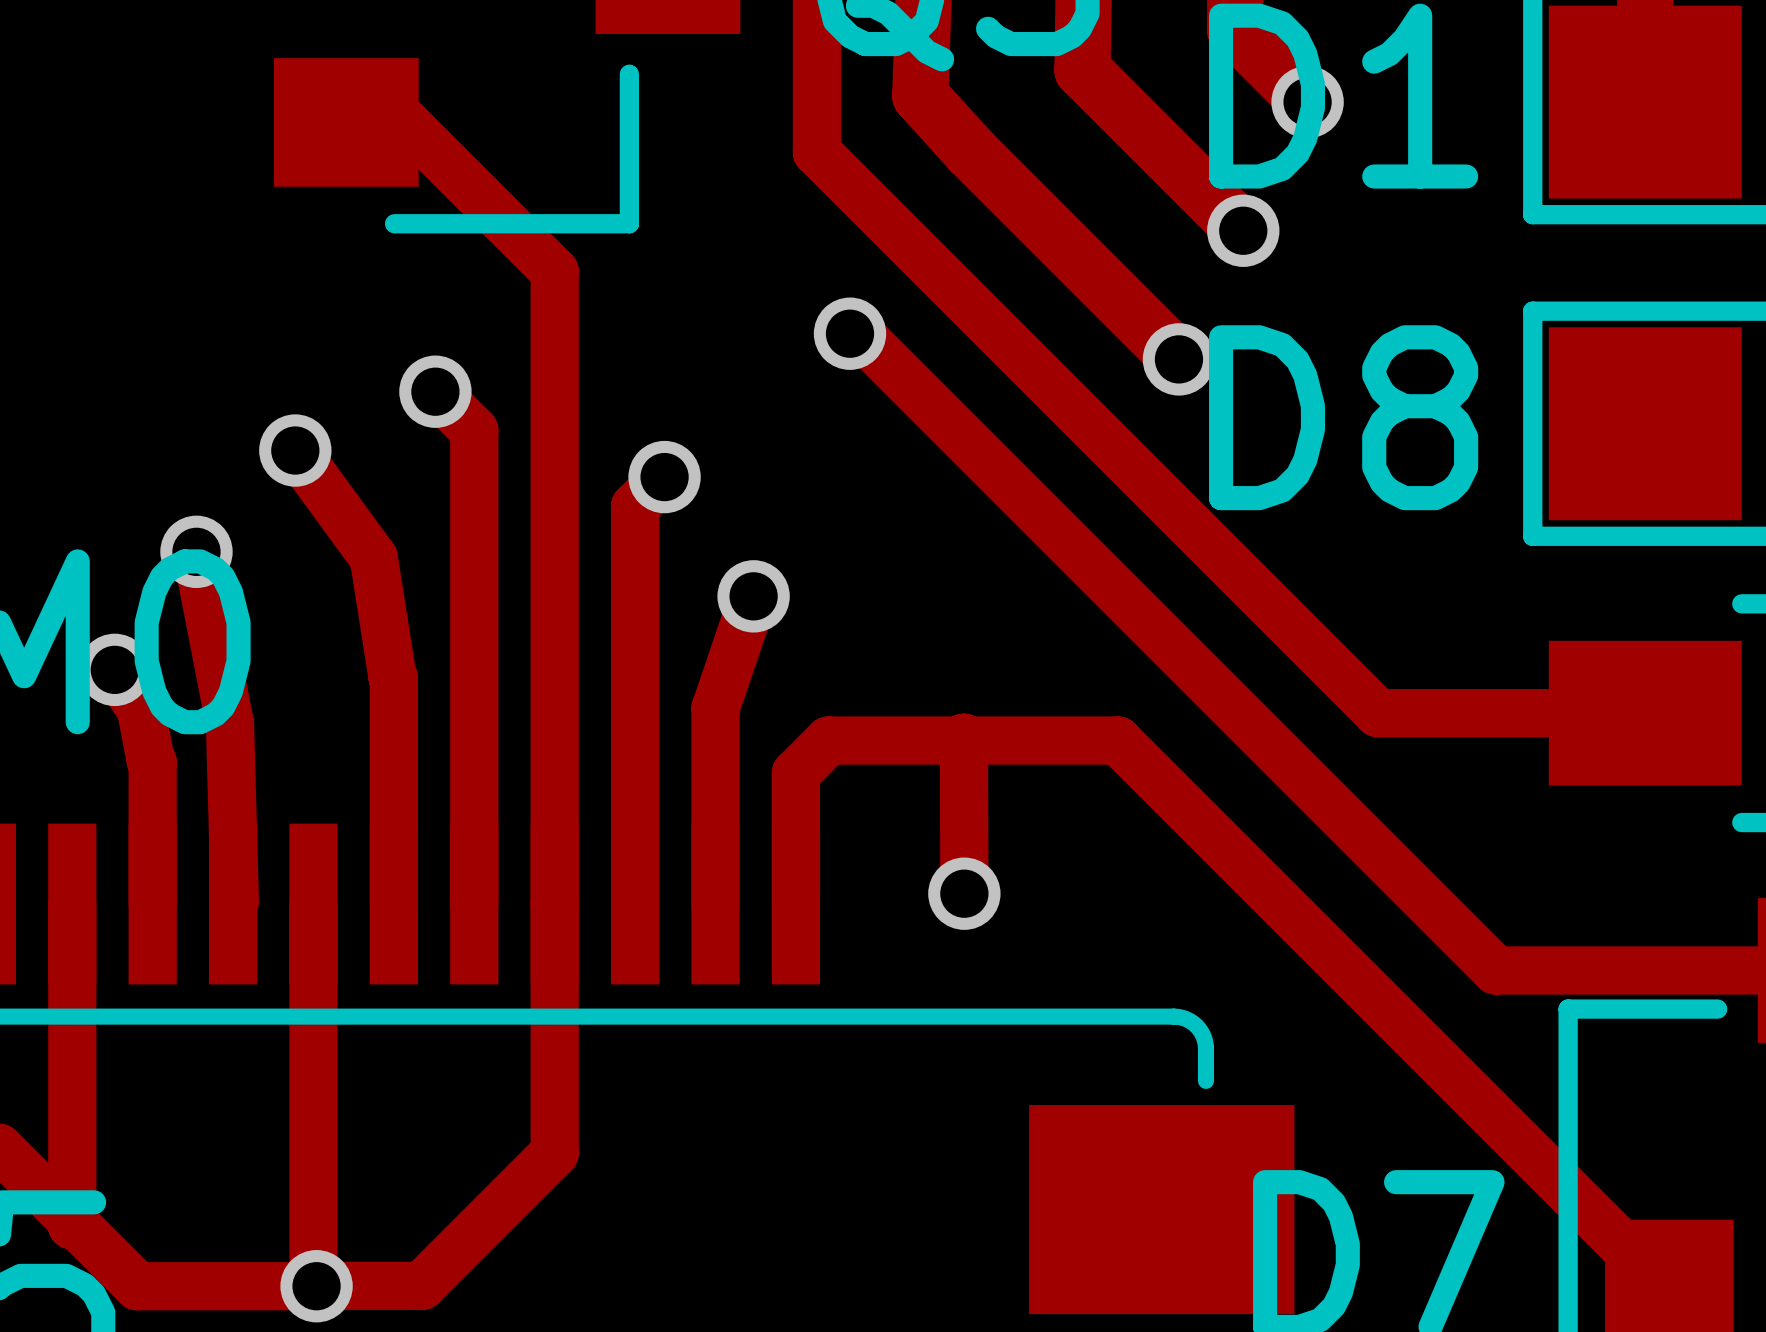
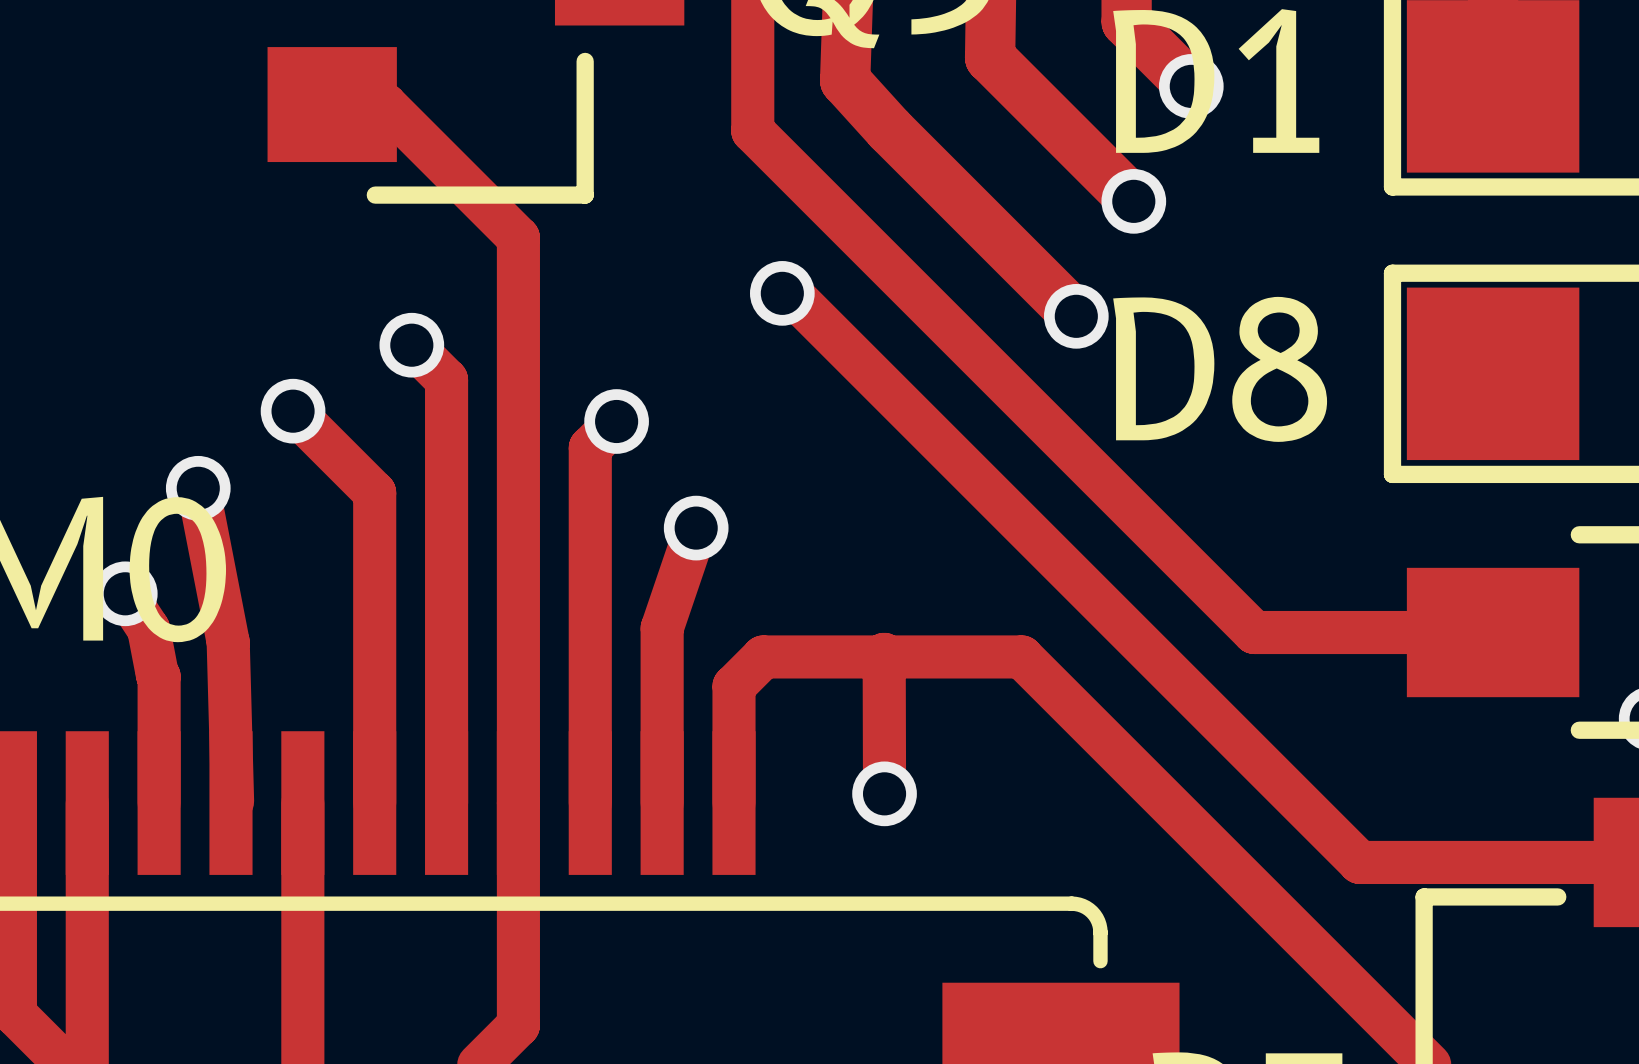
track: (295, 450) (373, 557) (392, 677) -> (293, 411) (374, 492) (374, 601)
via position: (295, 450) -> (293, 411)

